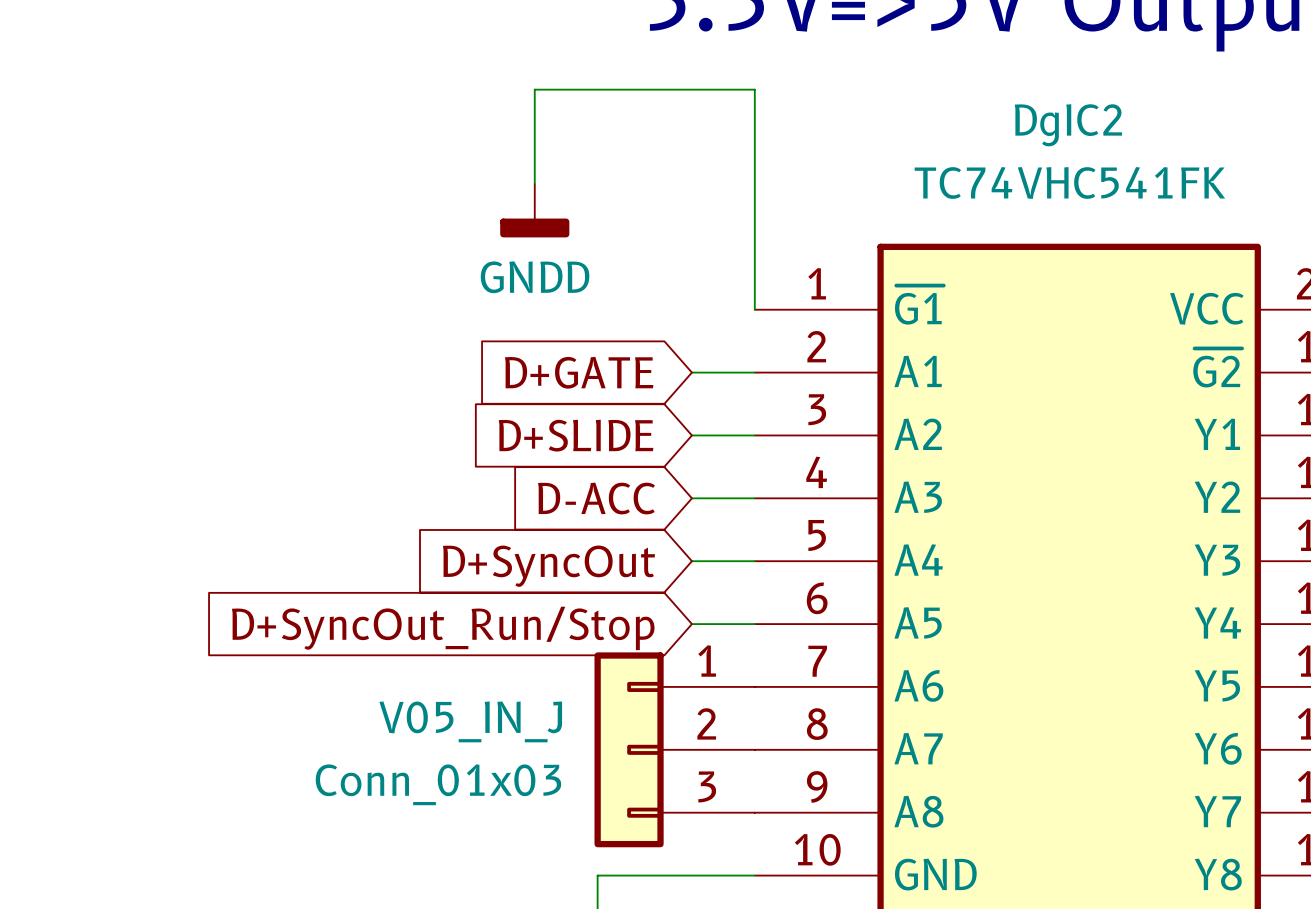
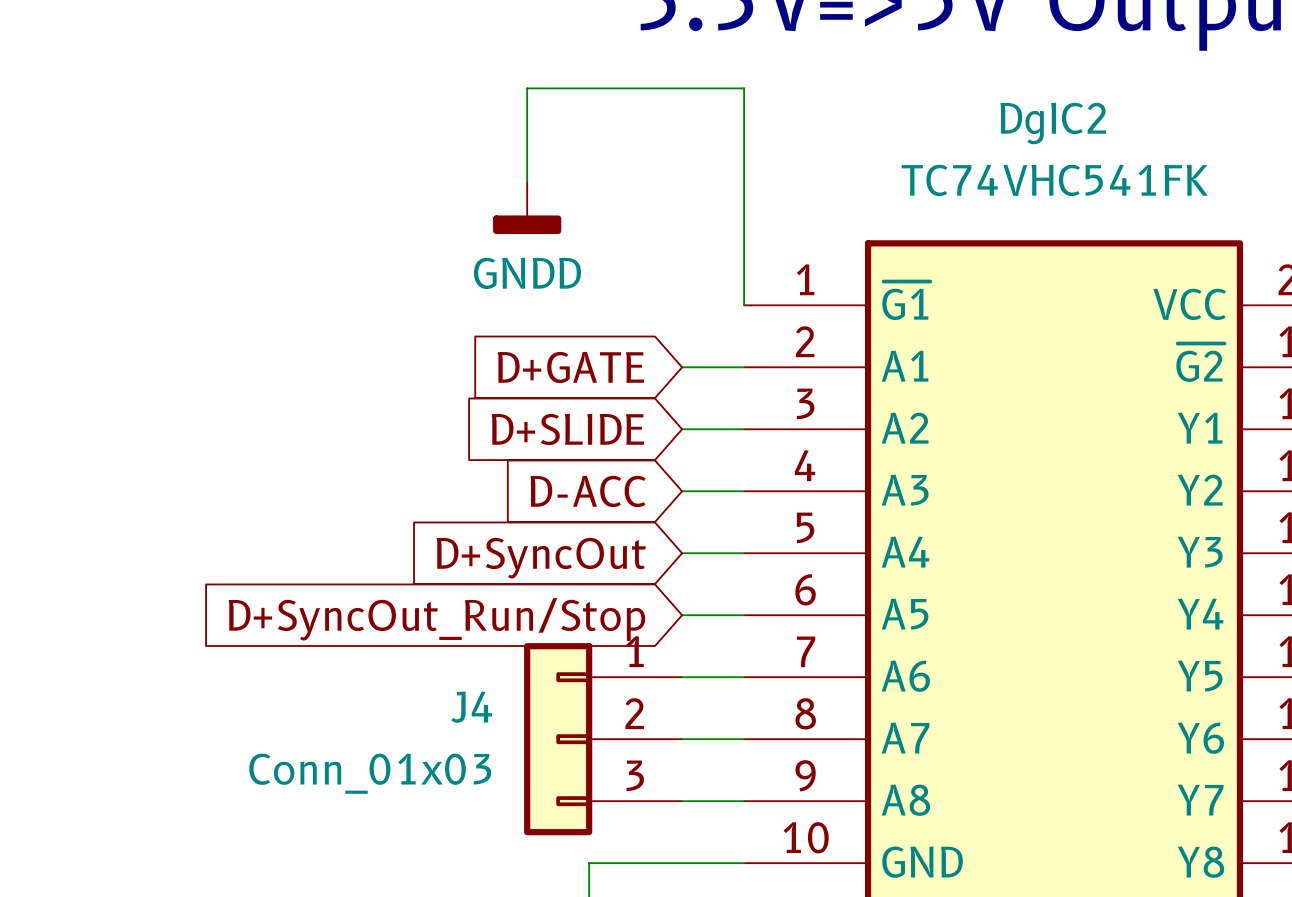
J4: none -> Conn_01x03 (603, 739)
V05_IN_J: Conn_01x03 (674, 749) -> none

